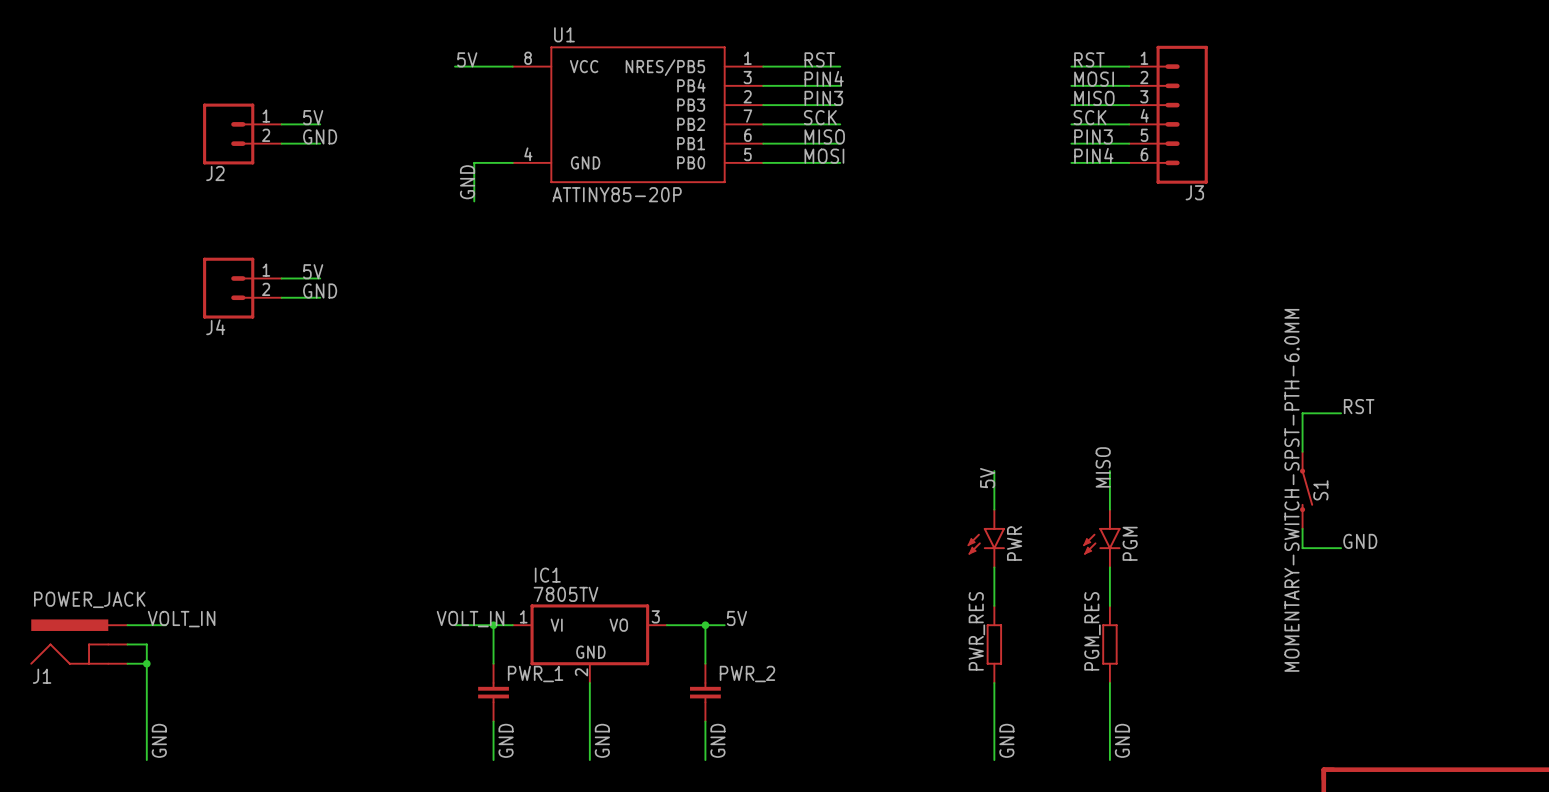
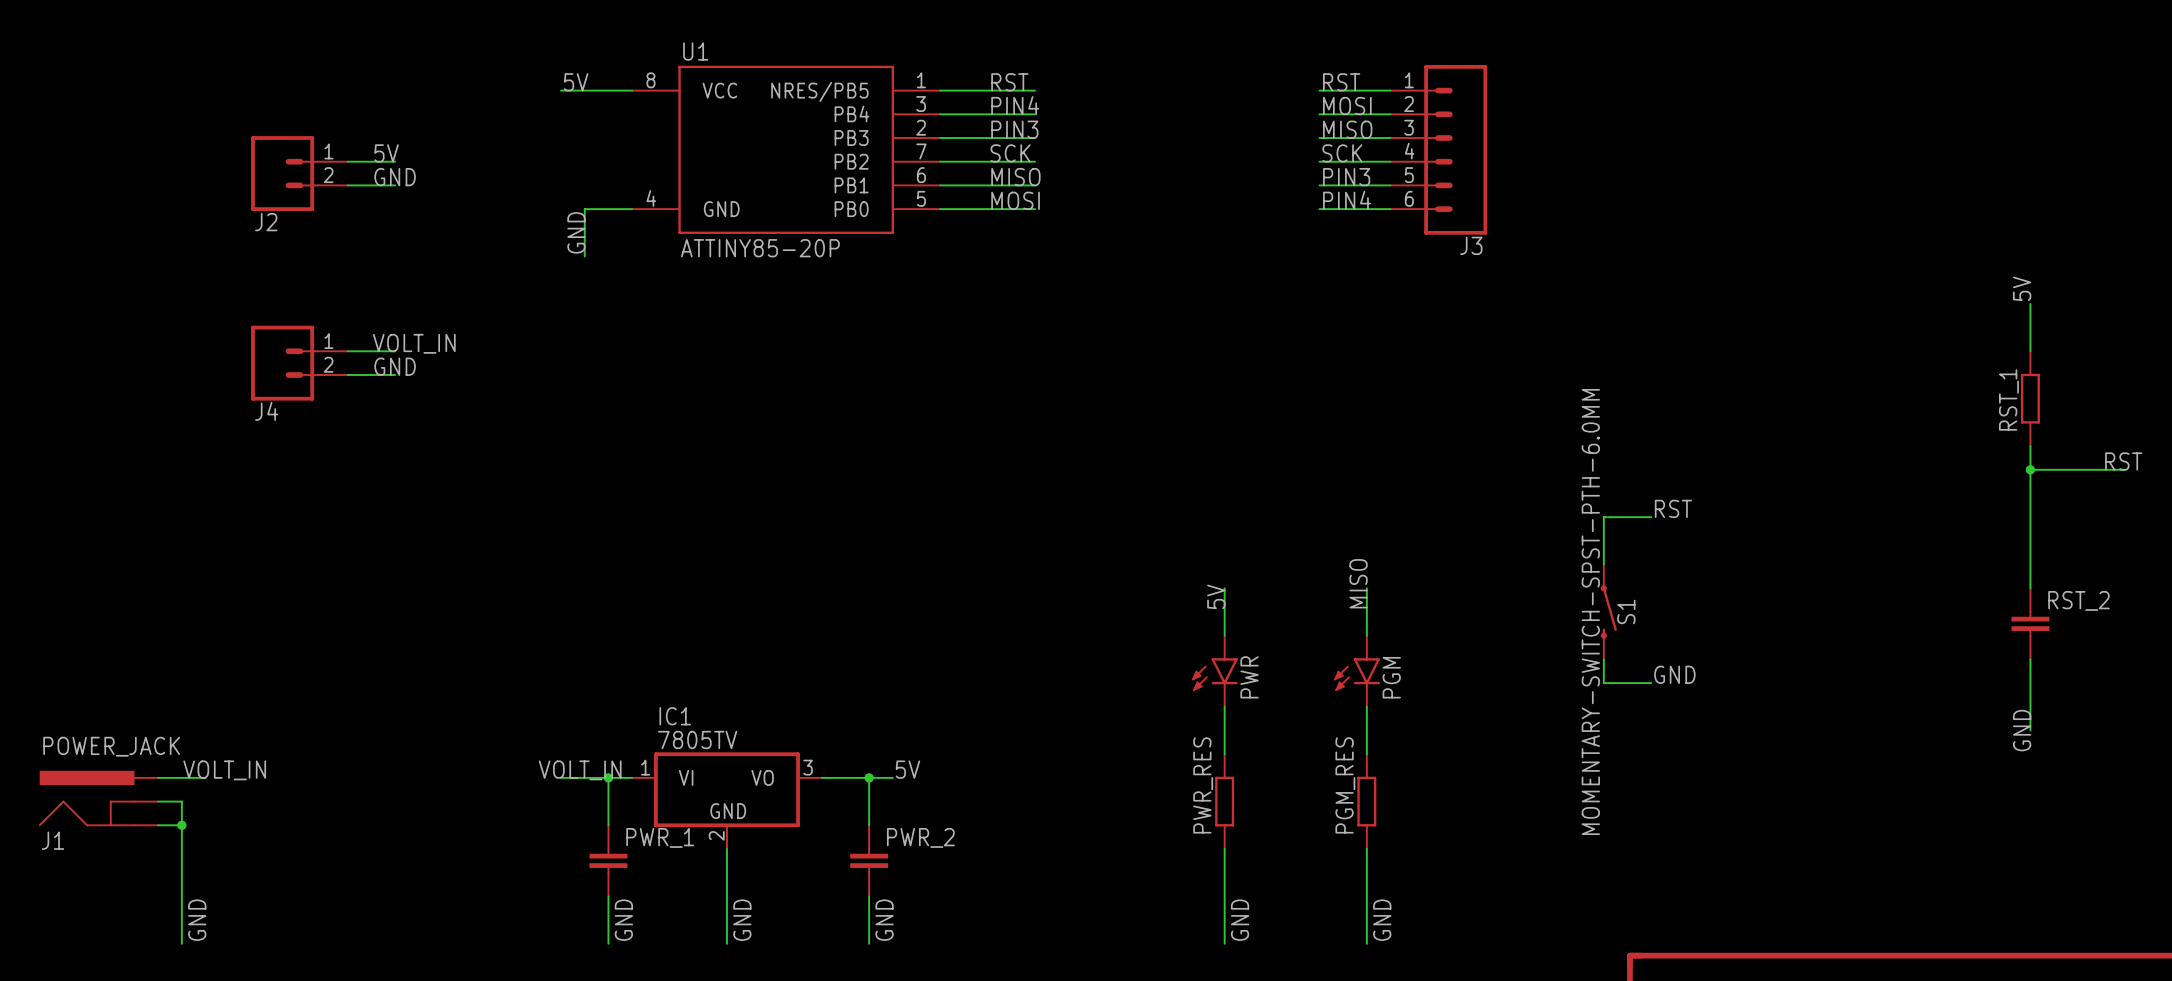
label: 5V (313, 271) -> VOLT_IN (414, 343)

